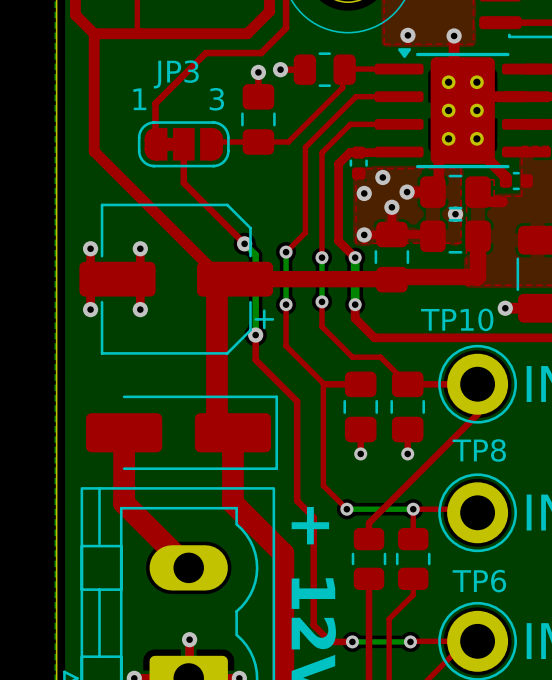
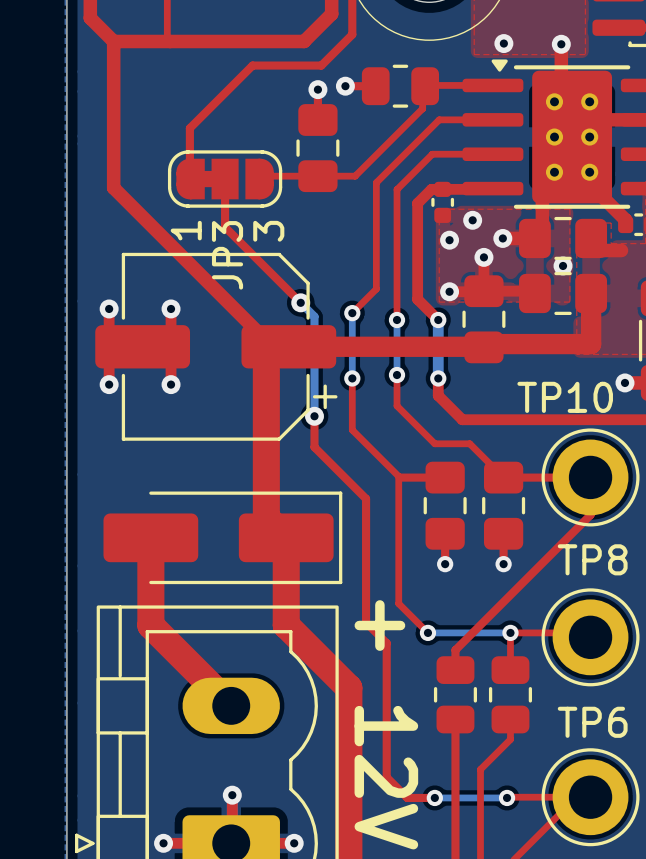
JP3 name rotation: 0° (176, 74) -> 90° counterclockwise (227, 255)
JP3 name position: JP3 (176, 74) -> JP3 (227, 255)
JP3 text rotation: 0° (139, 99) -> 90° counterclockwise (186, 230)
JP3 text position: 1 (139, 99) -> 1 (186, 230)
JP3 text rotation: 0° (216, 99) -> 90° counterclockwise (268, 231)
JP3 text position: 3 (216, 99) -> 3 (268, 231)

